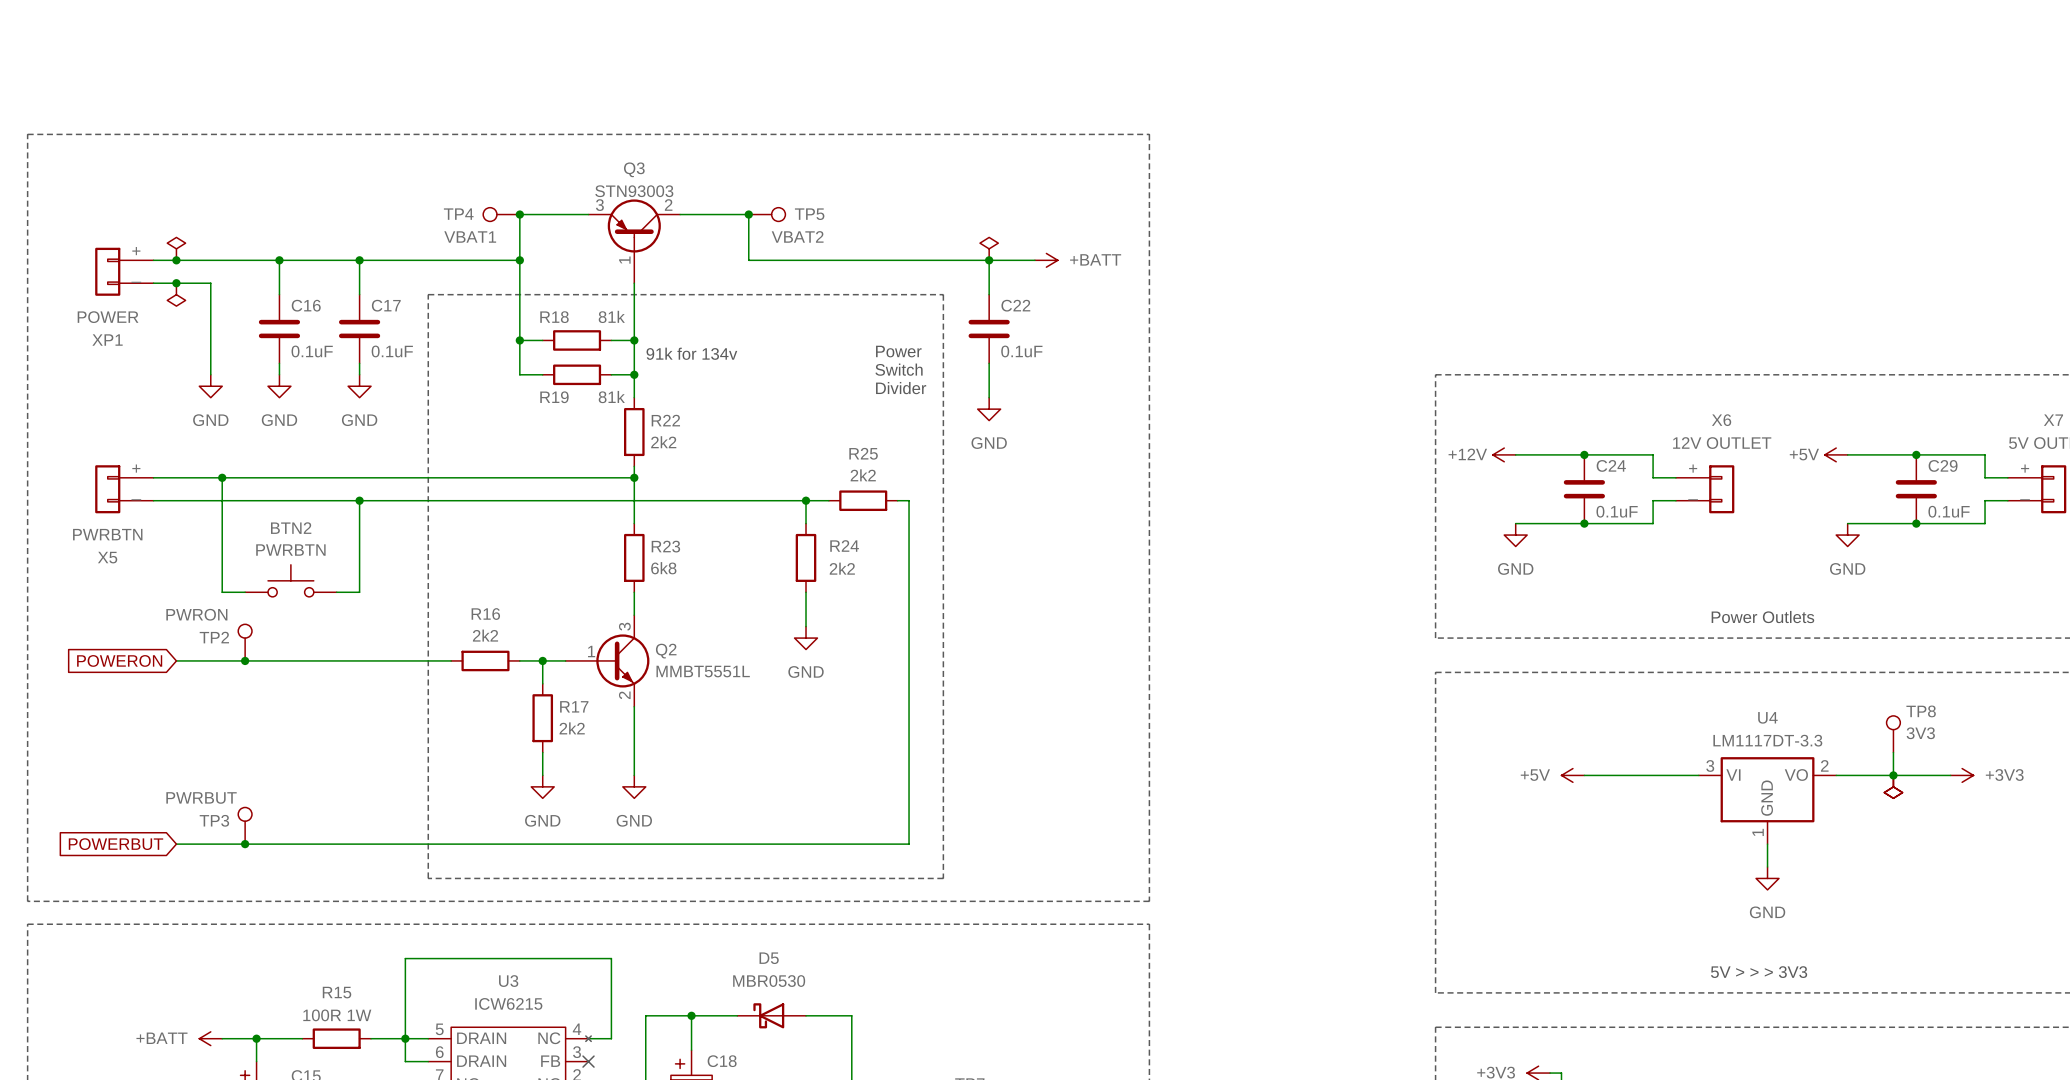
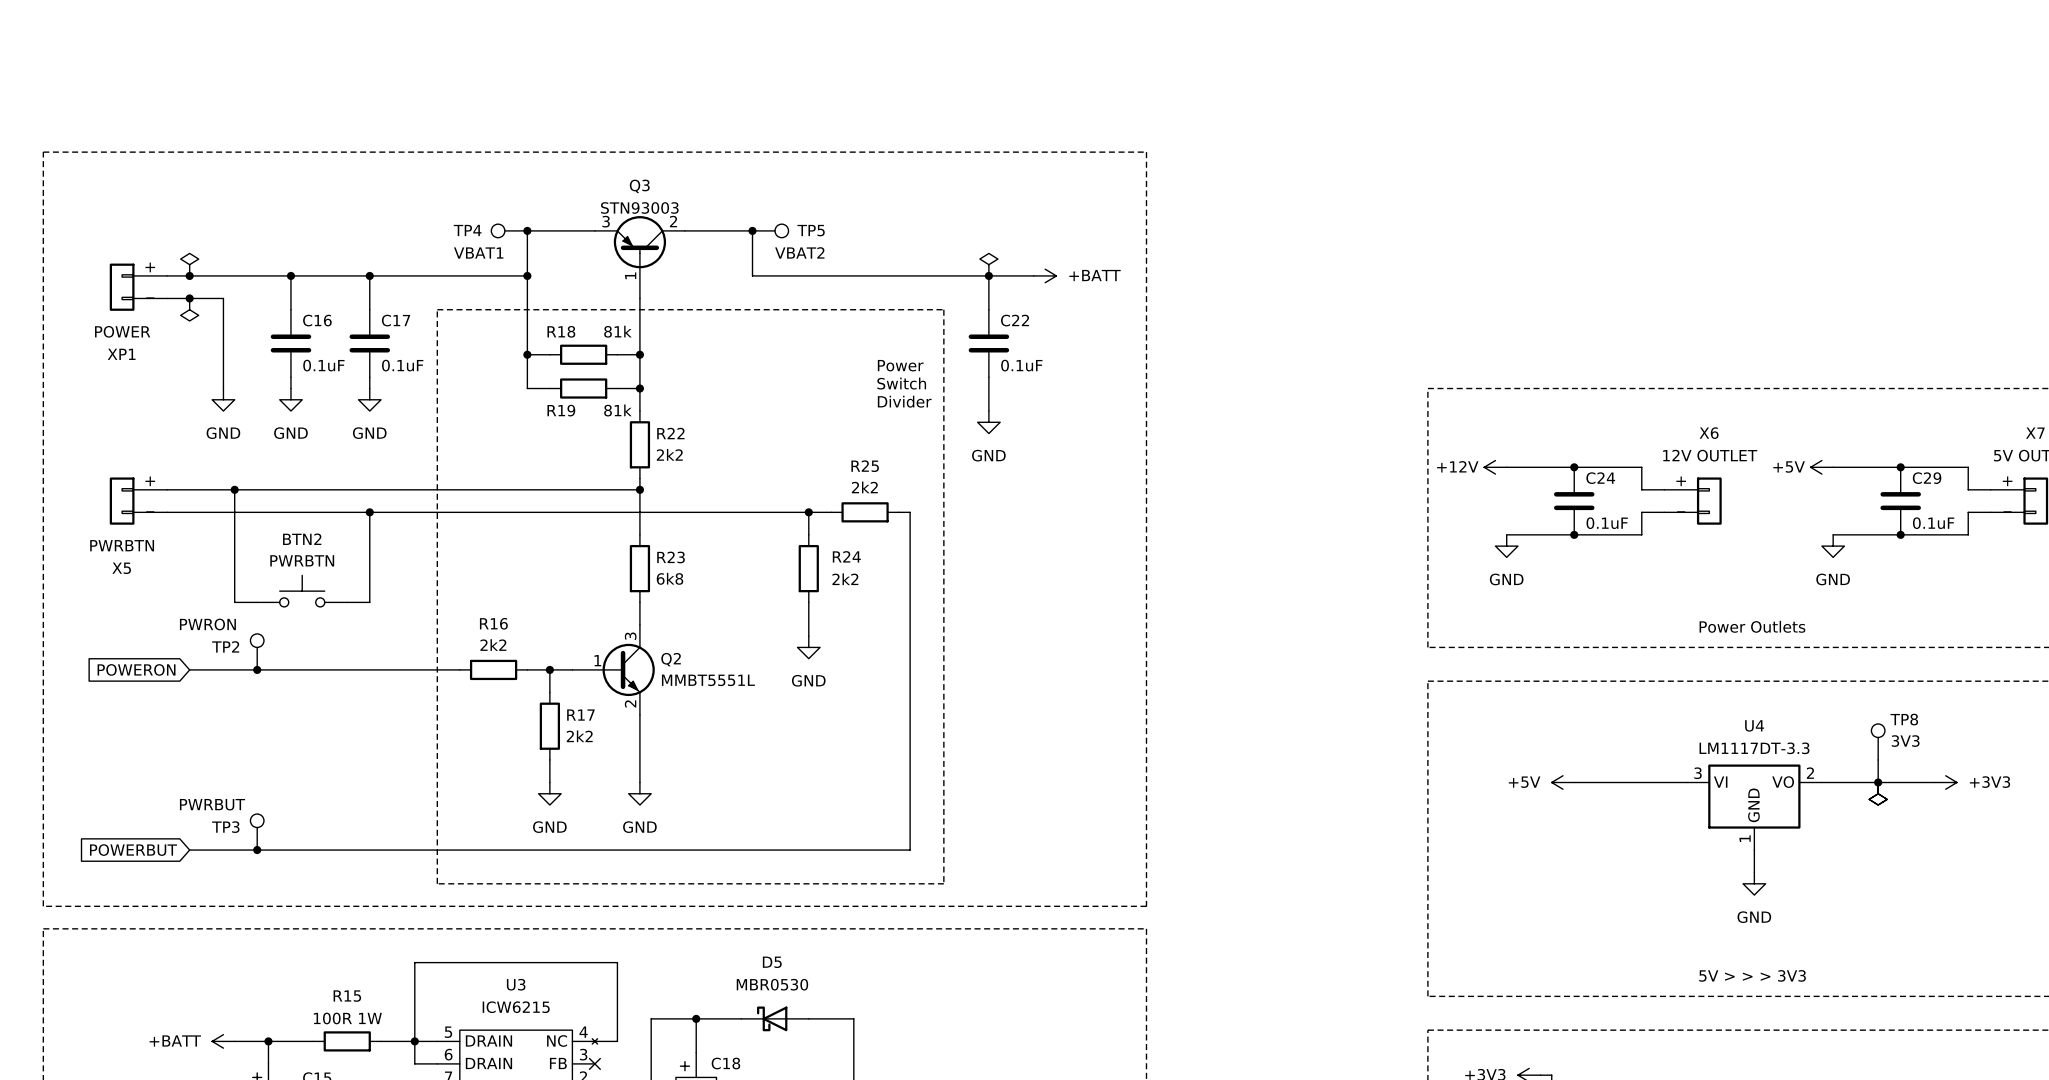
text: 91k for 134v (691, 353) -> none

